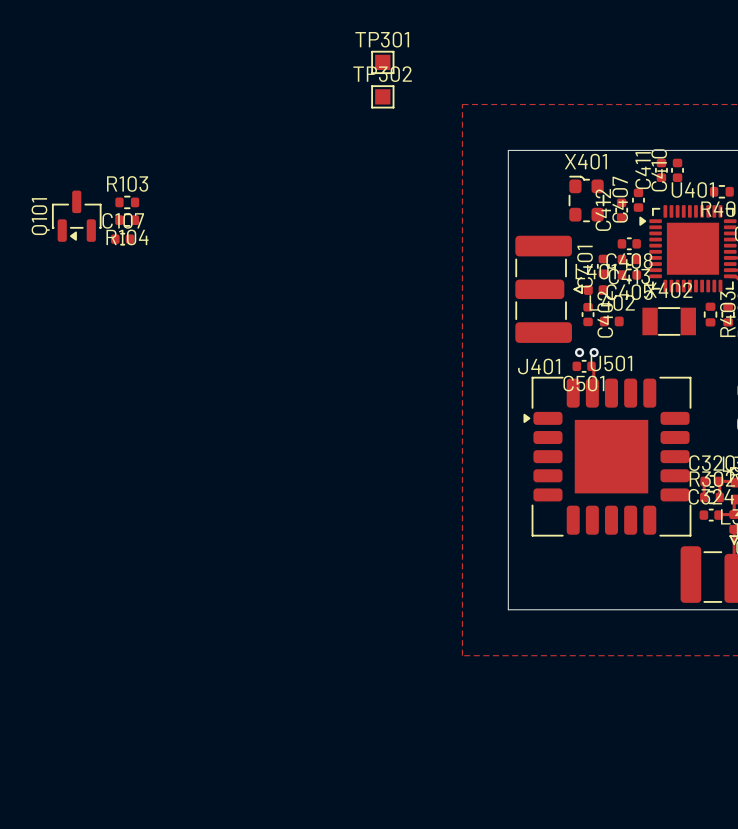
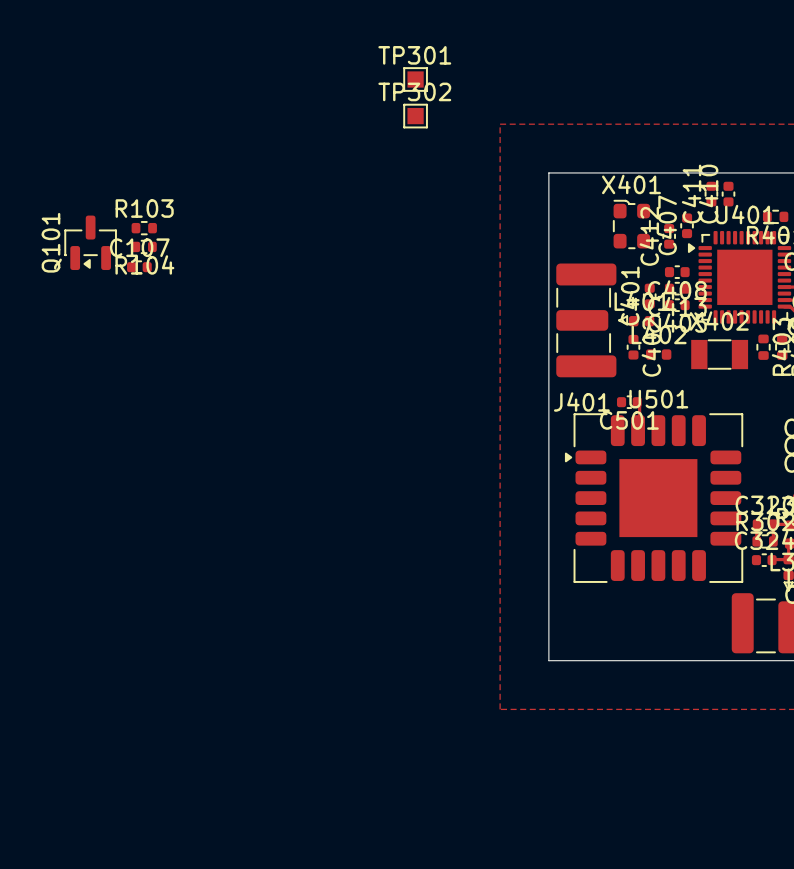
via: (579, 352) -> none
via: (594, 352) -> none
track: (734, 533) (734, 556) -> none

